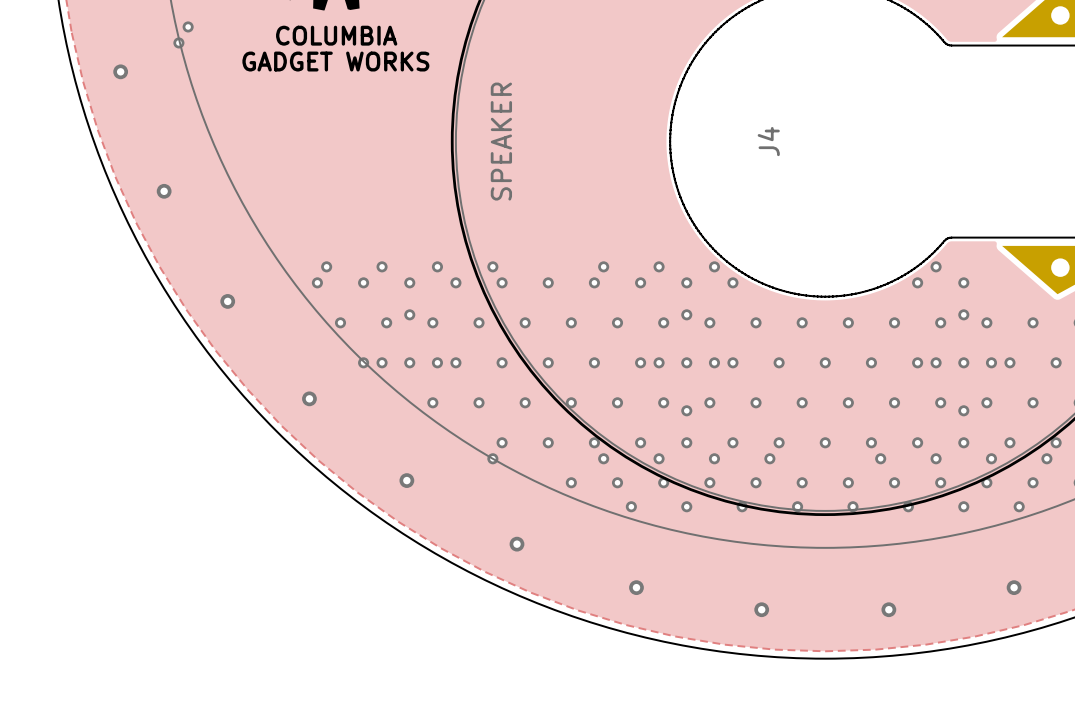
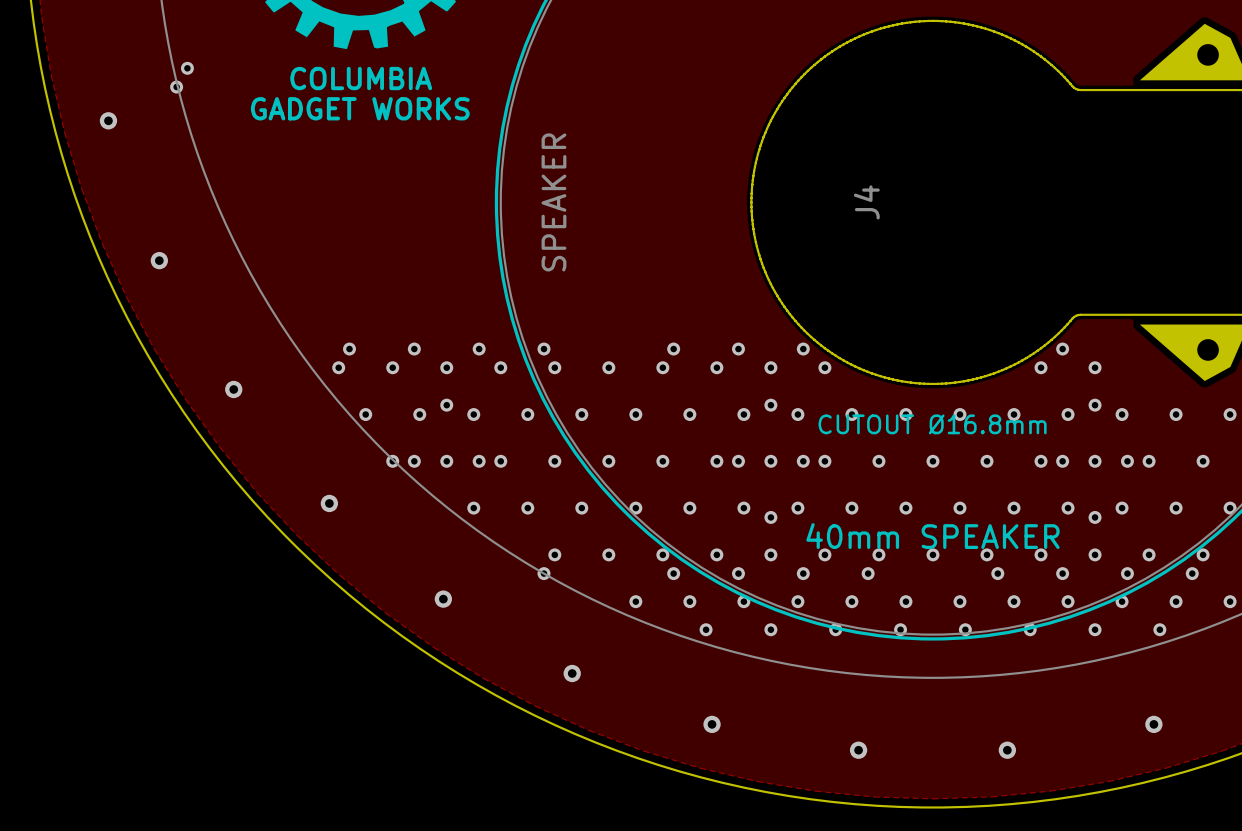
text: none -> CUTOUT Ø16.8mm (932, 424)
text: none -> 40mm SPEAKER (932, 536)

